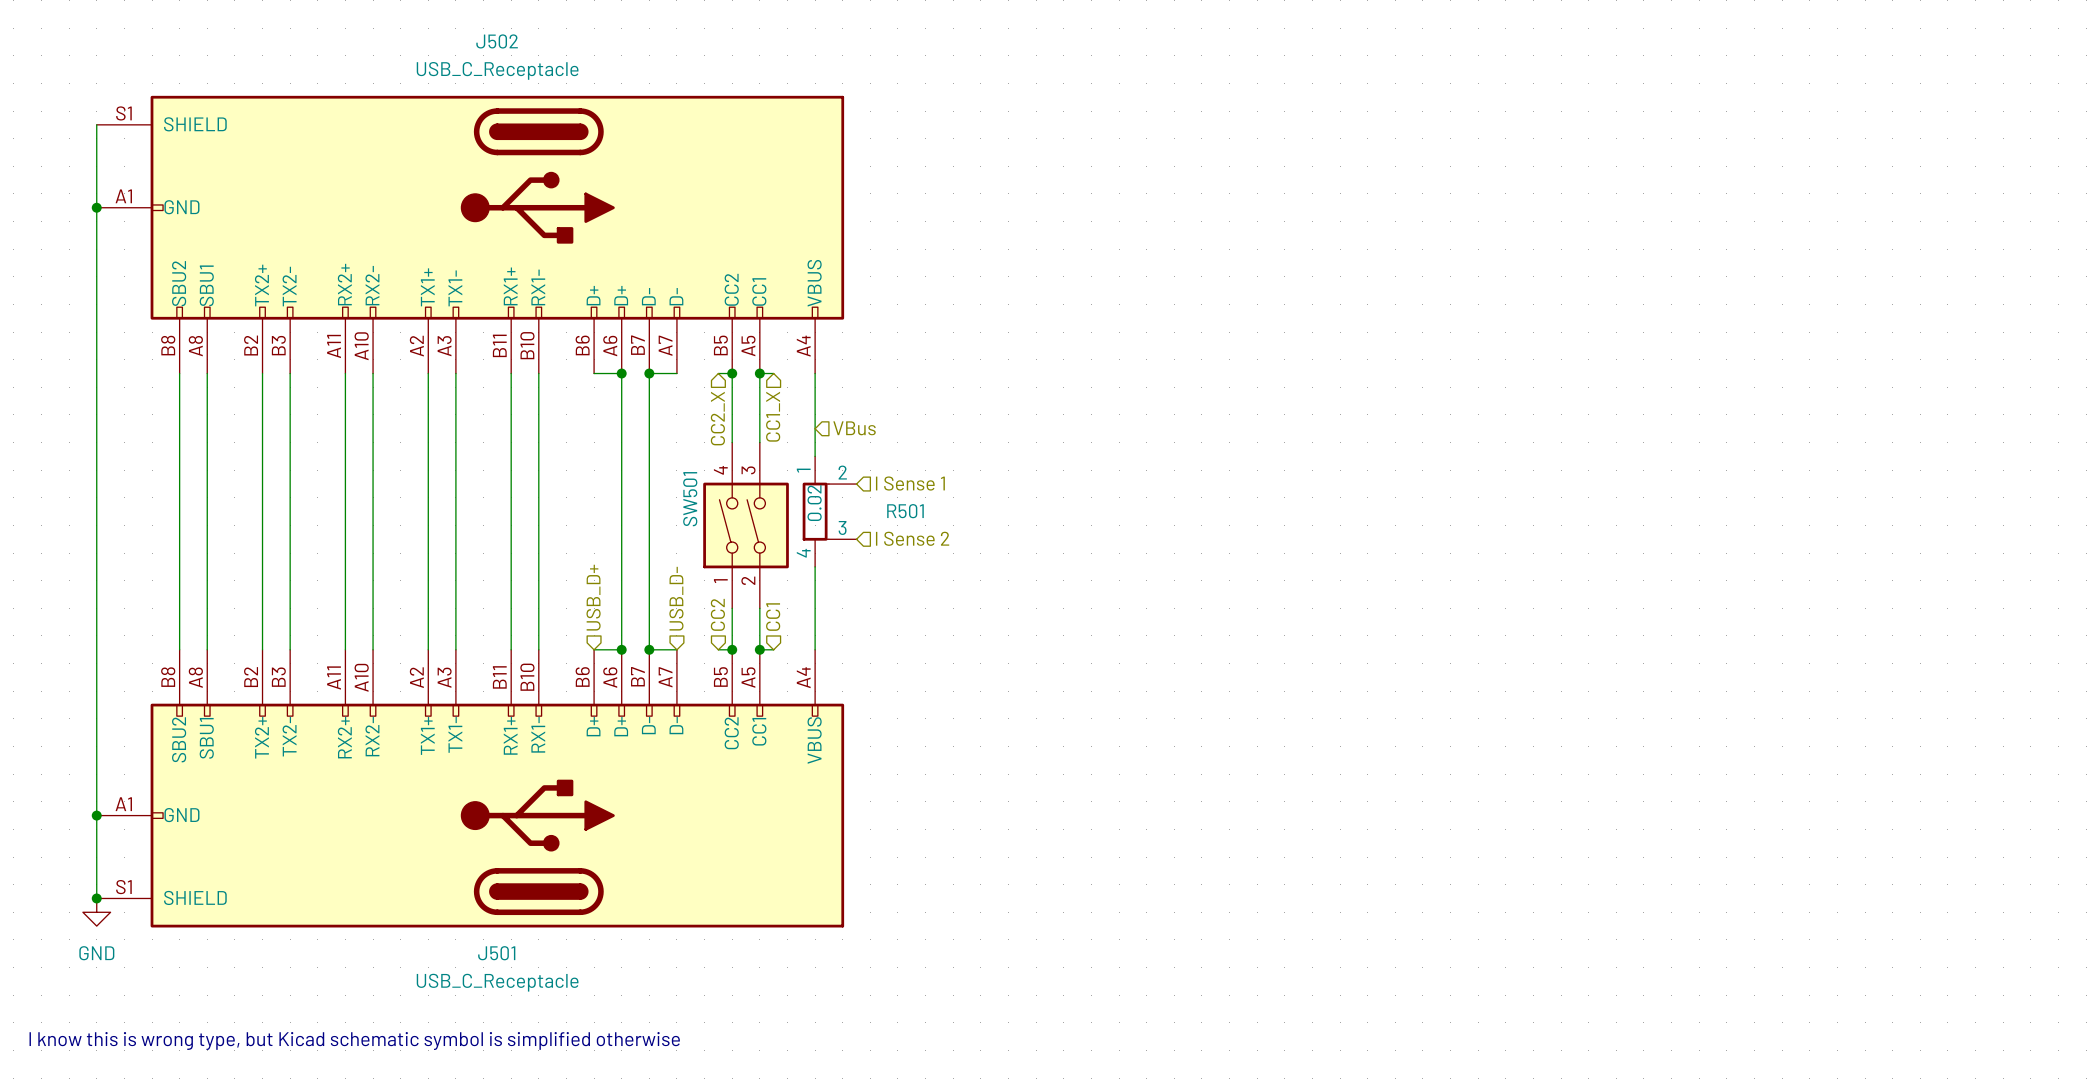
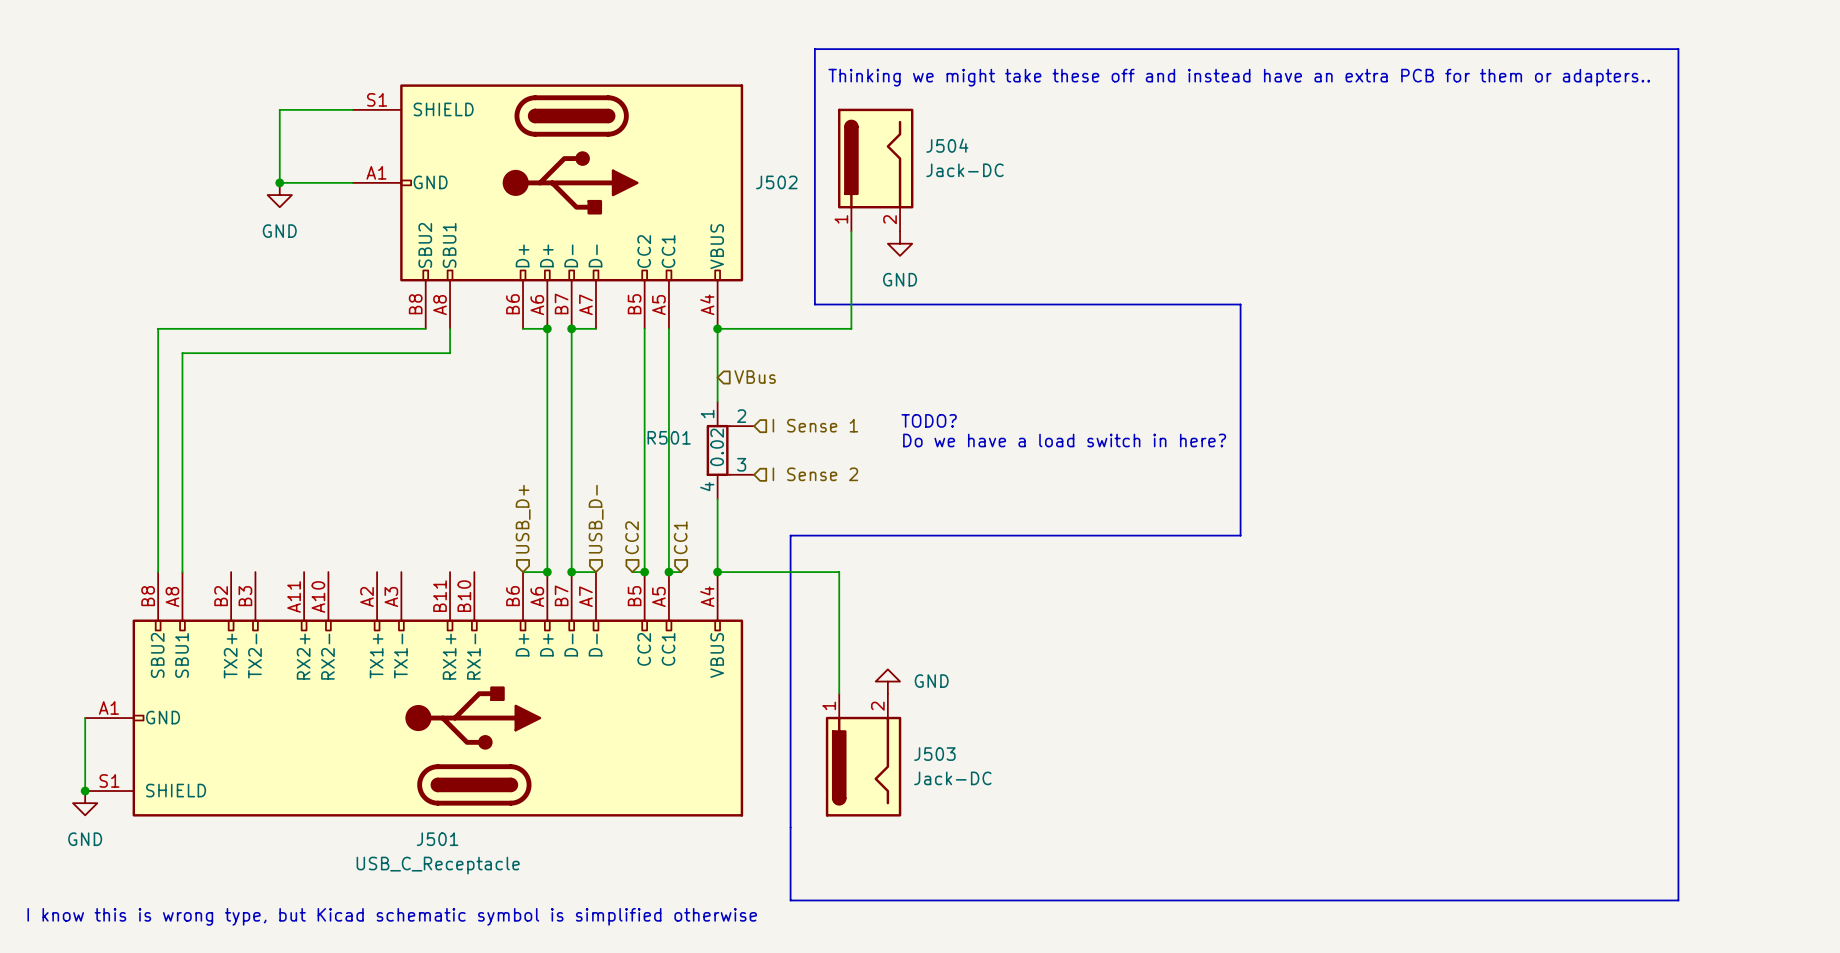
J502 name position: J502 (497, 41) -> J502 (776, 182)
line: none -> (814, 49) (1678, 49) (1678, 900) (790, 900) (790, 535) (1240, 535) (1240, 304) (814, 304) (814, 49)
J502 value: USB_C_Receptacle (497, 70) -> none
text: none -> Thinking we might take these off and instead have an extra PCB for them or adapters.. (1239, 77)
J502 symbol: [96, 95, 845, 374] -> [352, 84, 744, 329]
wire: (96, 124) (96, 815) -> none
J504: none -> Jack-DC (875, 170)
junction: (96, 207) -> none
junction: none -> (279, 182)
power symbol: none -> GND (279, 195)
wire: none -> (851, 231) (851, 328) (717, 328)
power symbol: none -> GND (900, 243)
wire: none -> (158, 328) (425, 328)
wire: (207, 373) (207, 401) -> (450, 353) (182, 353)
wire: (262, 373) (262, 649) -> none
wire: (290, 373) (290, 649) -> none
wire: (345, 373) (345, 649) -> none
wire: (373, 373) (373, 649) -> none
wire: (428, 373) (428, 649) -> none
wire: (455, 373) (455, 649) -> none
wire: (538, 373) (538, 649) -> none
wire: (718, 373) (732, 373) -> none
junction: (732, 373) -> none
wire: (759, 373) (773, 373) -> none
junction: (759, 373) -> none
junction: none -> (717, 328)
wire: (511, 401) (511, 649) -> none
hierarchical label: CC1_X (773, 416) -> none
hierarchical label: CC2_X (717, 418) -> none
text: none -> TODO? (929, 420)
text: none -> Do we have a load switch in here? (1064, 440)
R501 name position: R501 (905, 511) -> R501 (669, 437)
SW501: (746, 525) -> none
wire: none -> (717, 572) (839, 572) (839, 693)
junction: none -> (717, 572)
power symbol: none -> GND (887, 681)
junction: (96, 815) -> none
J503: none -> Jack-DC (863, 755)

